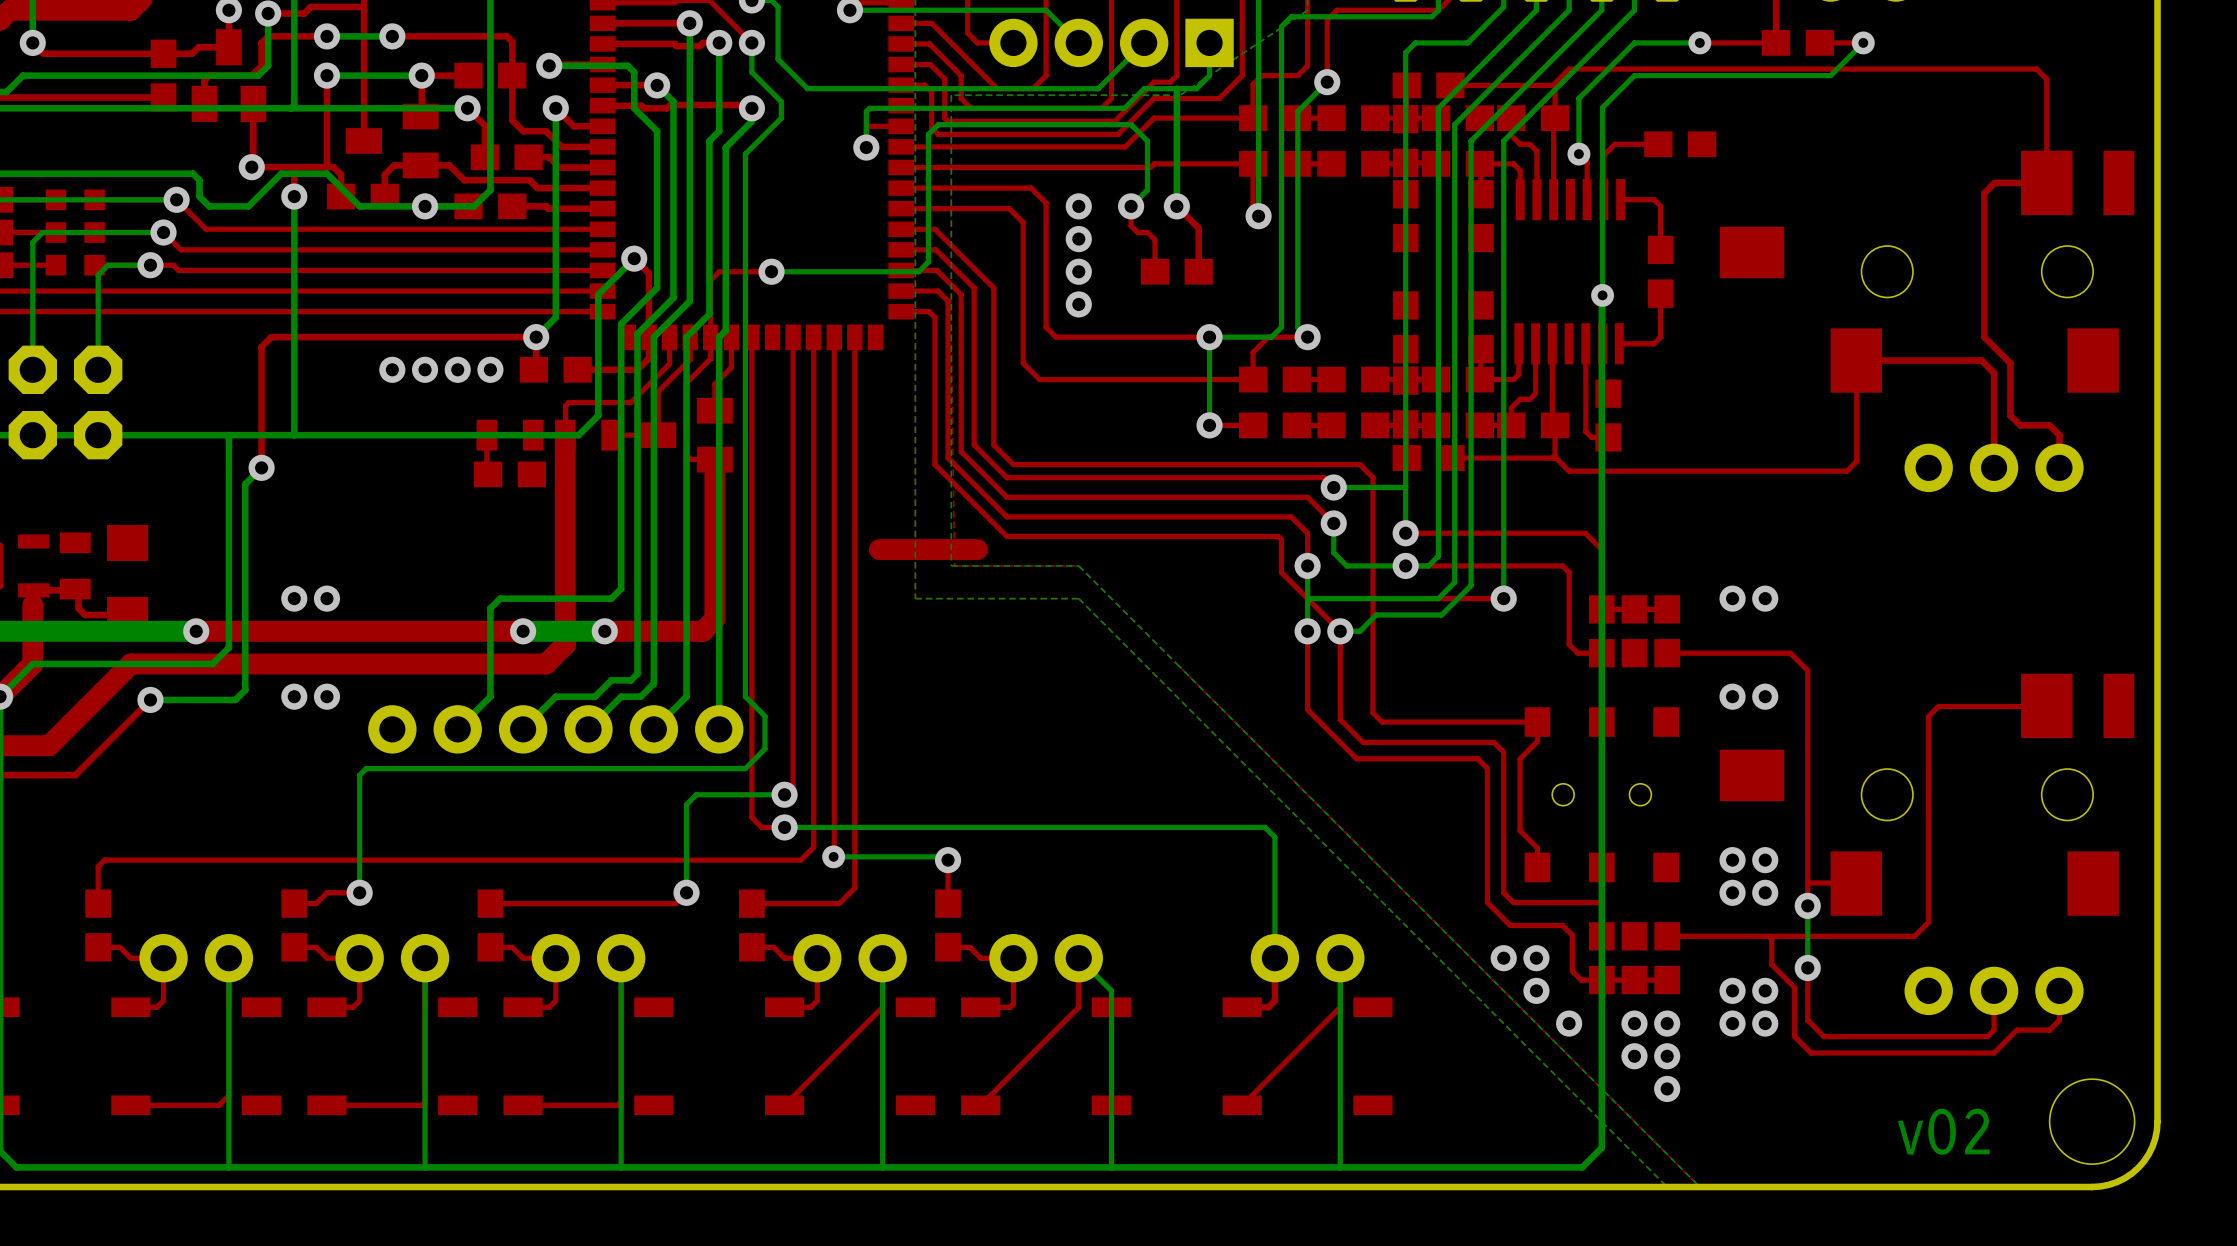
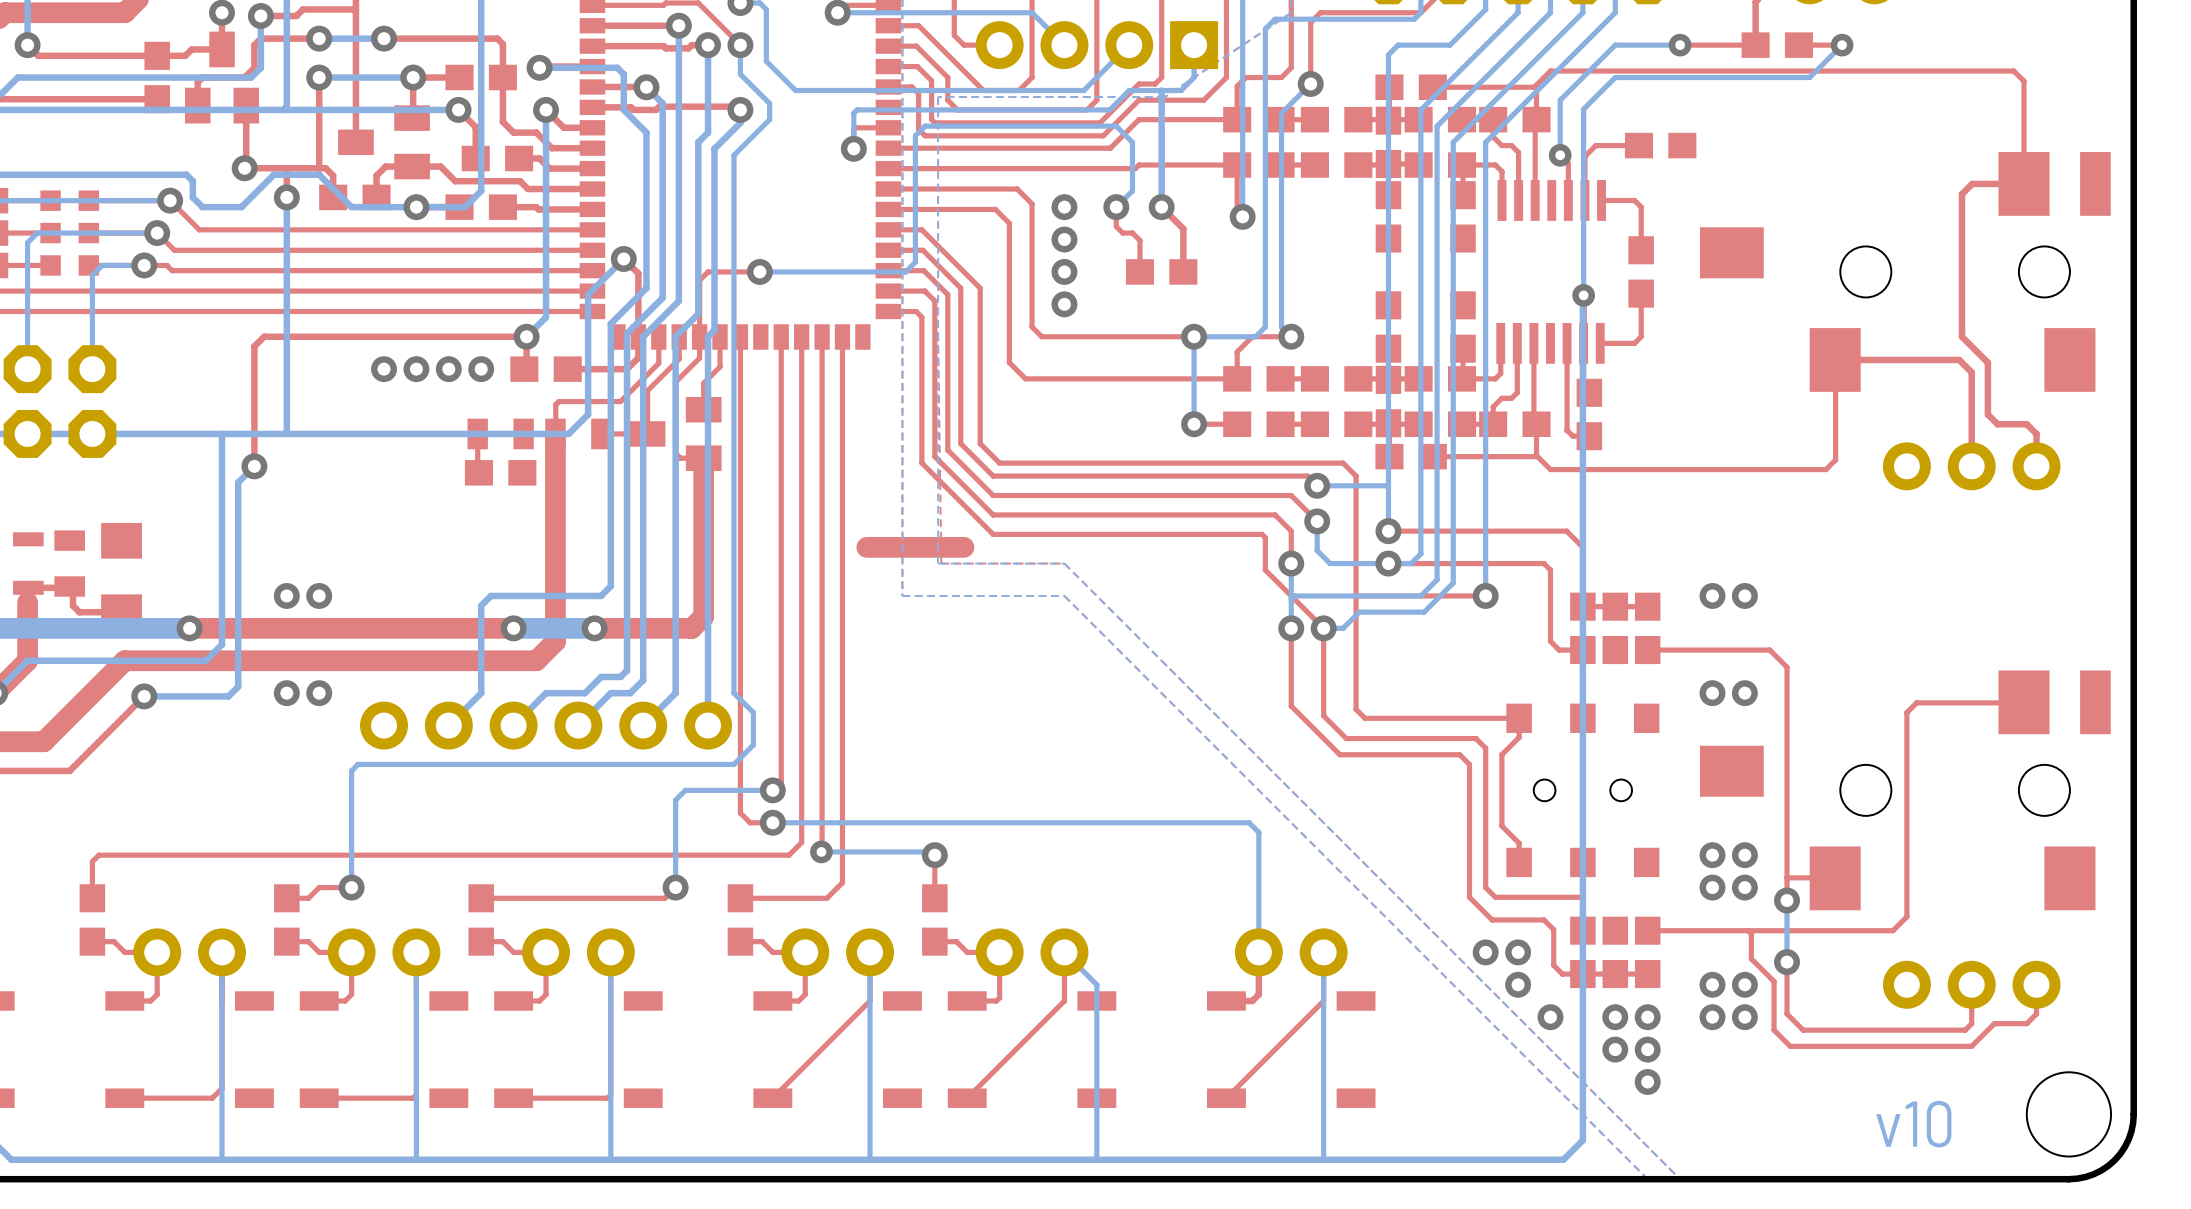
text: v02 (1943, 1131) -> v10 (1913, 1124)

